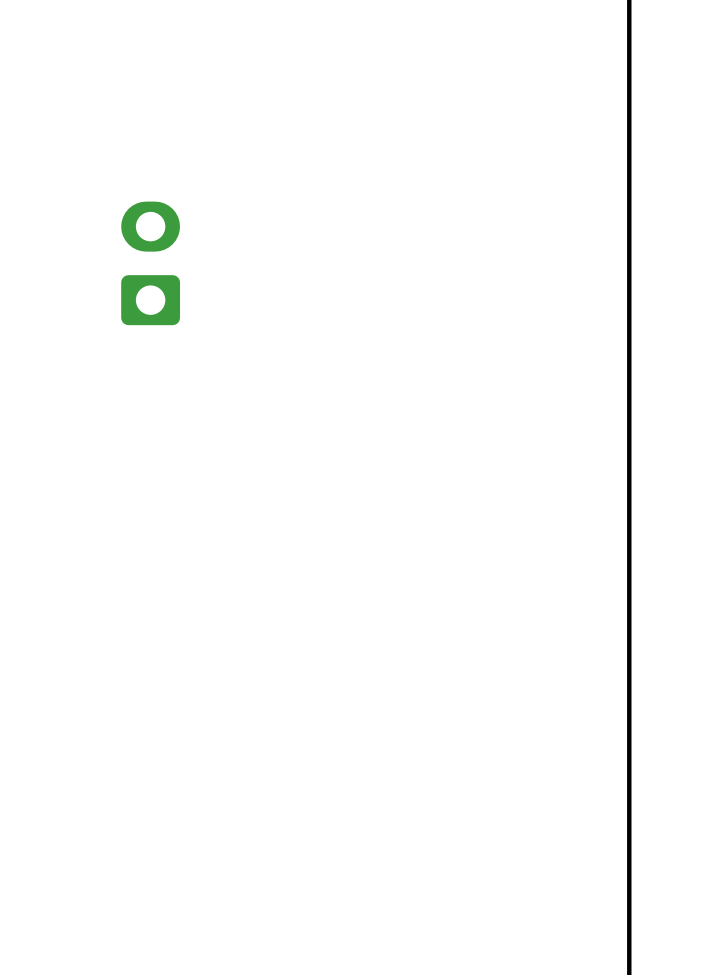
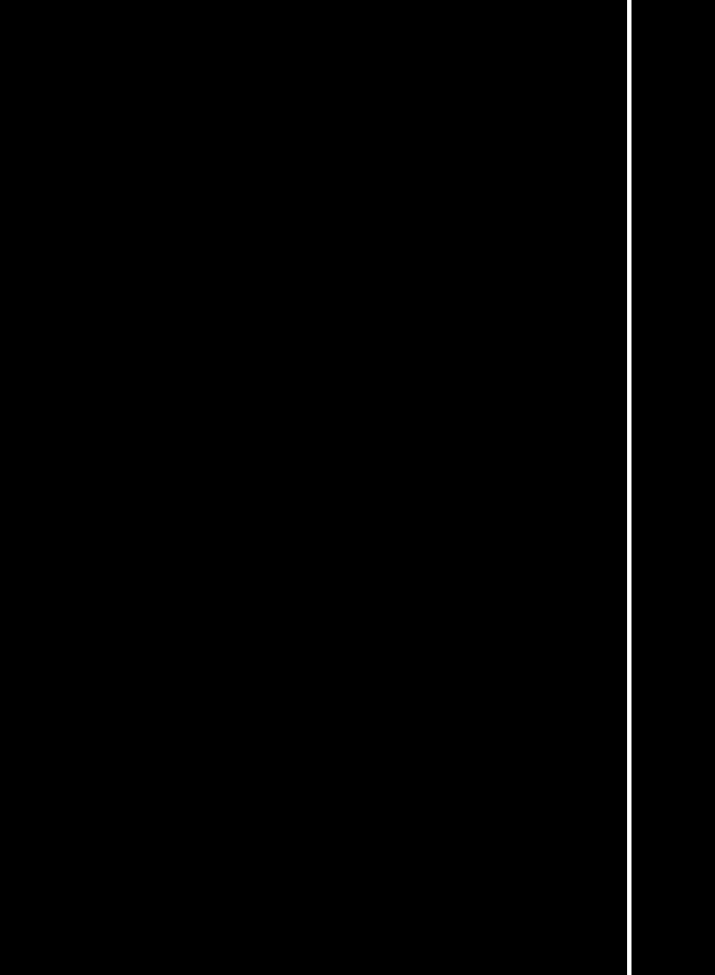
part: (150, 263) -> none

